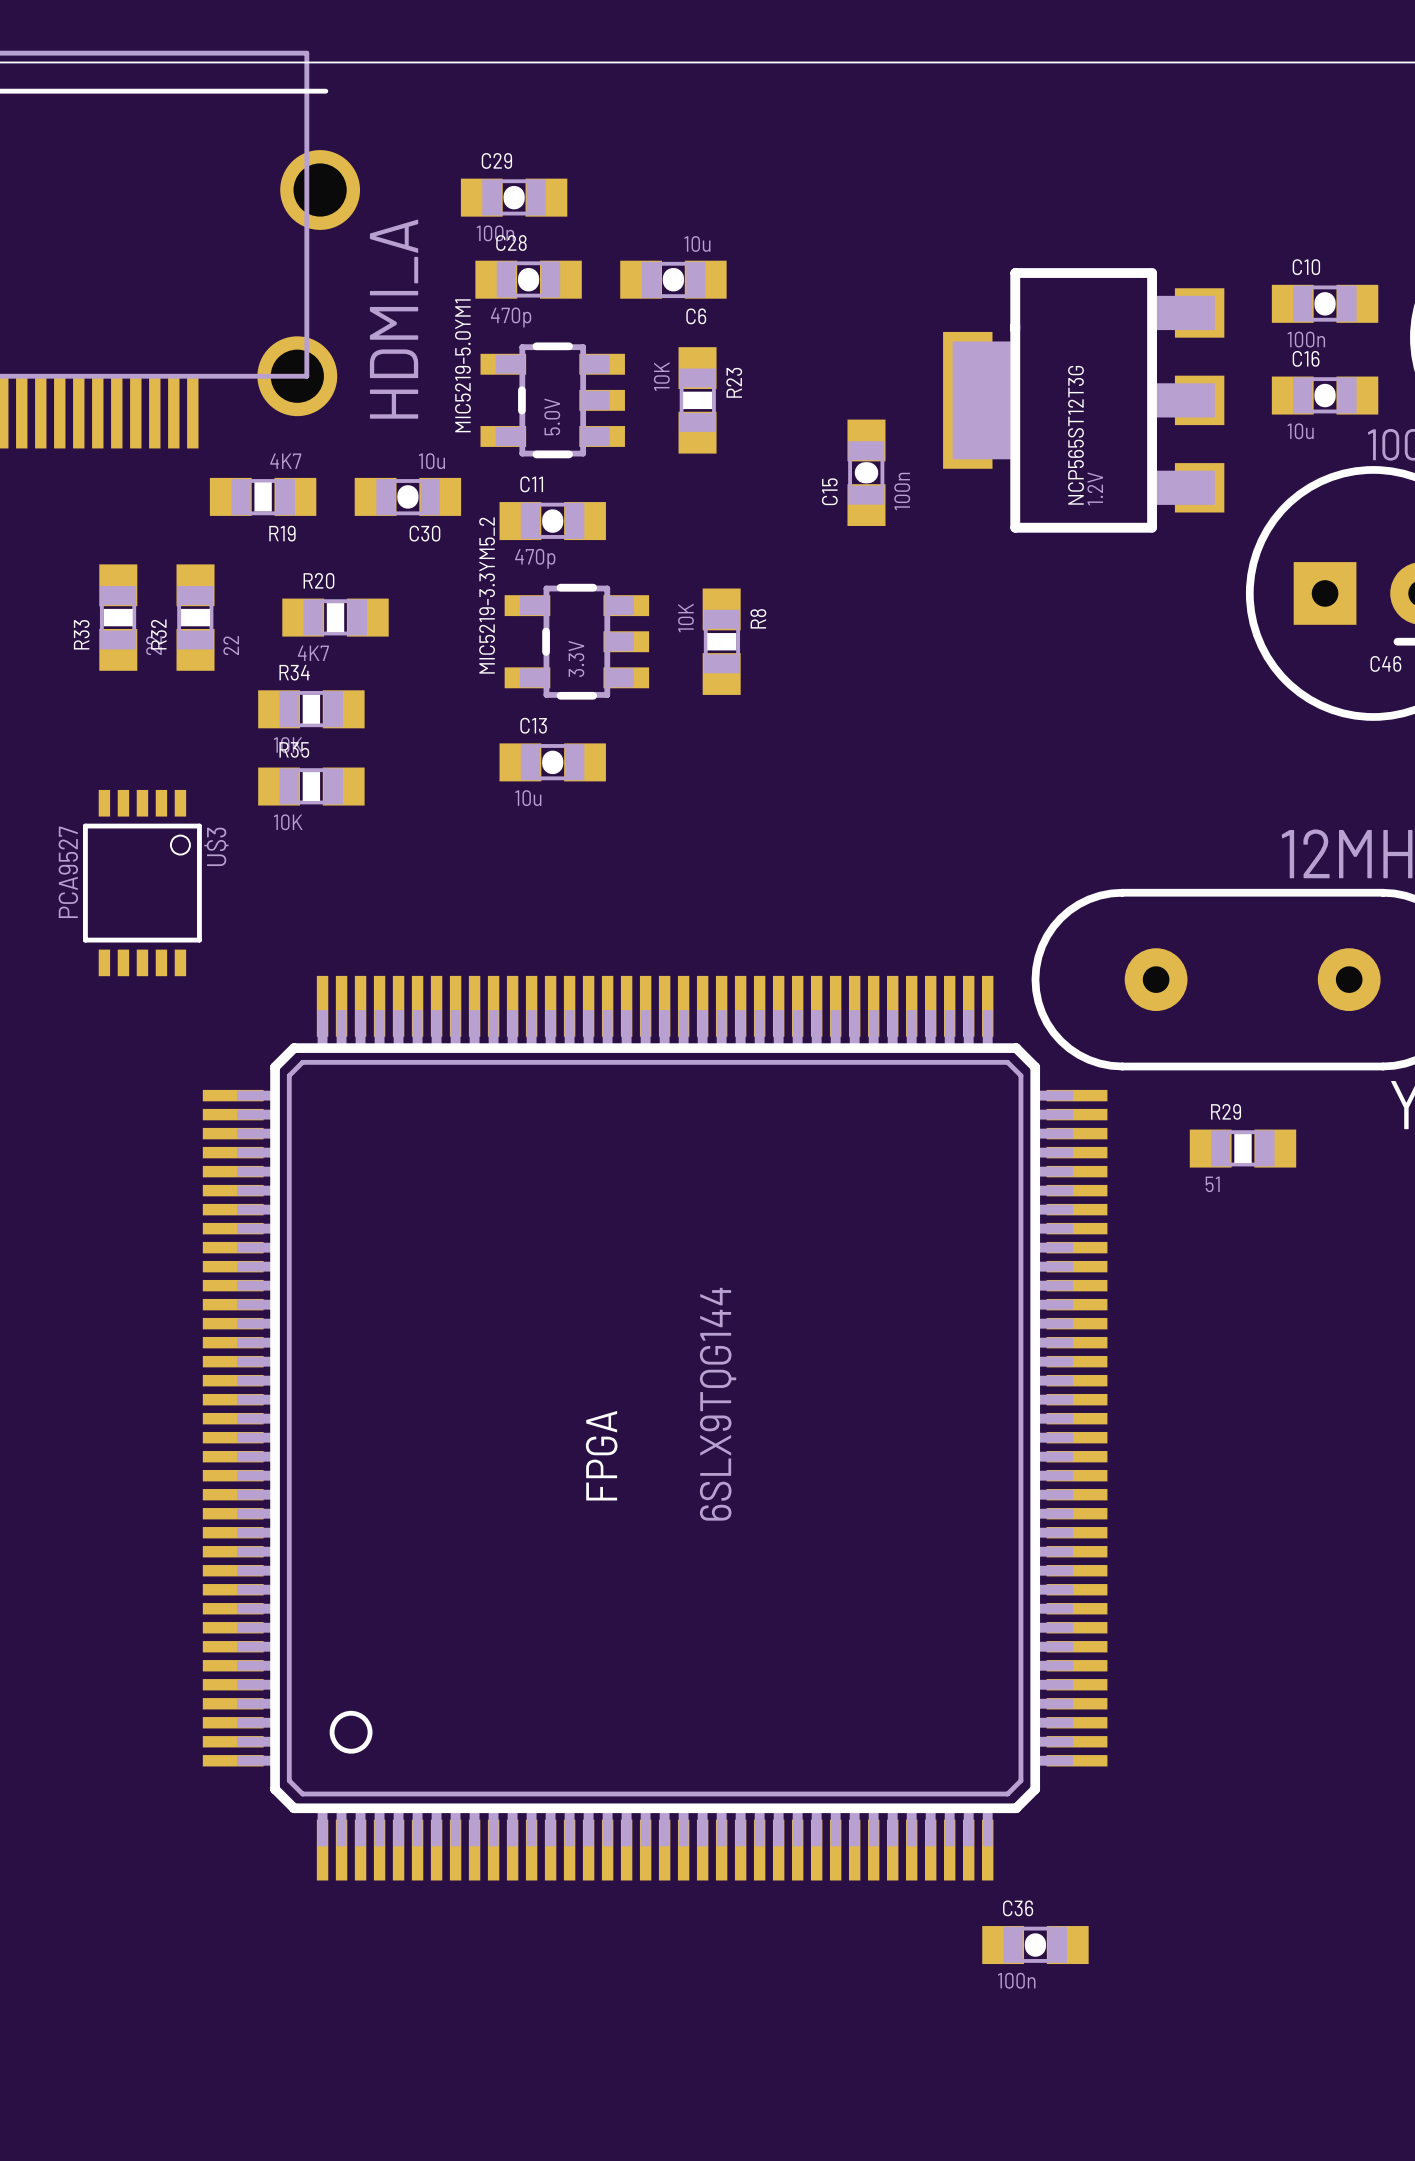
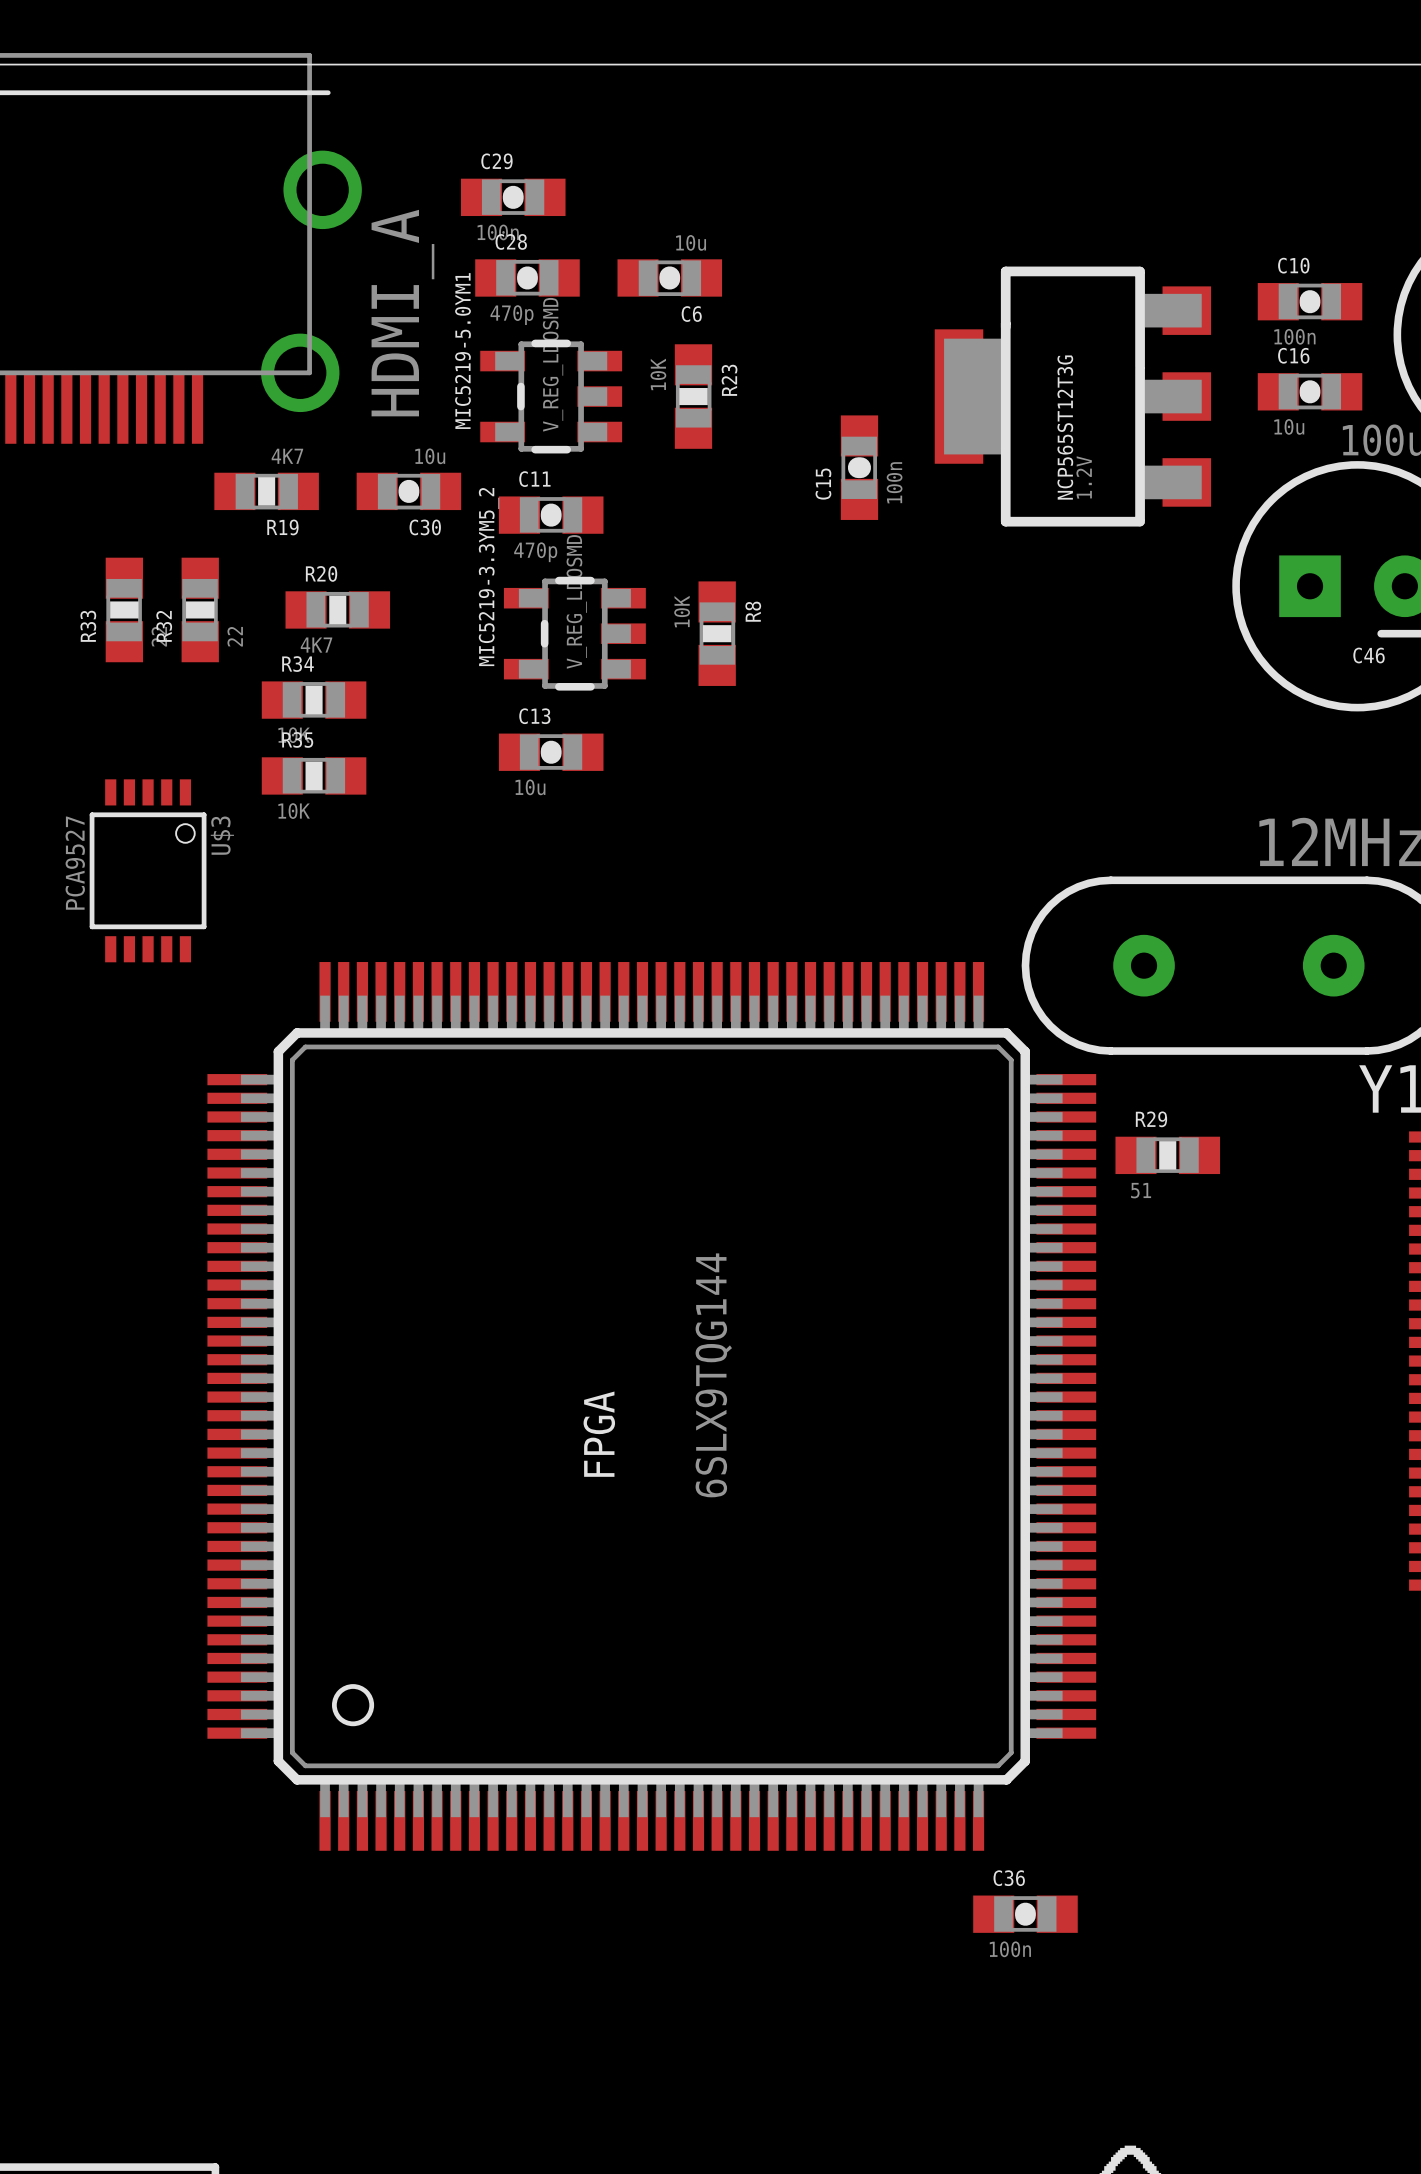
MIC5219-5.0YM1 value: 5.0V (552, 416) -> V_REG_LDOSMD (553, 364)
MIC5219-3.3YM5_2 value: 3.3V (576, 658) -> V_REG_LDOSMD (576, 601)
R29 position: (1243, 1148) -> (1167, 1155)

